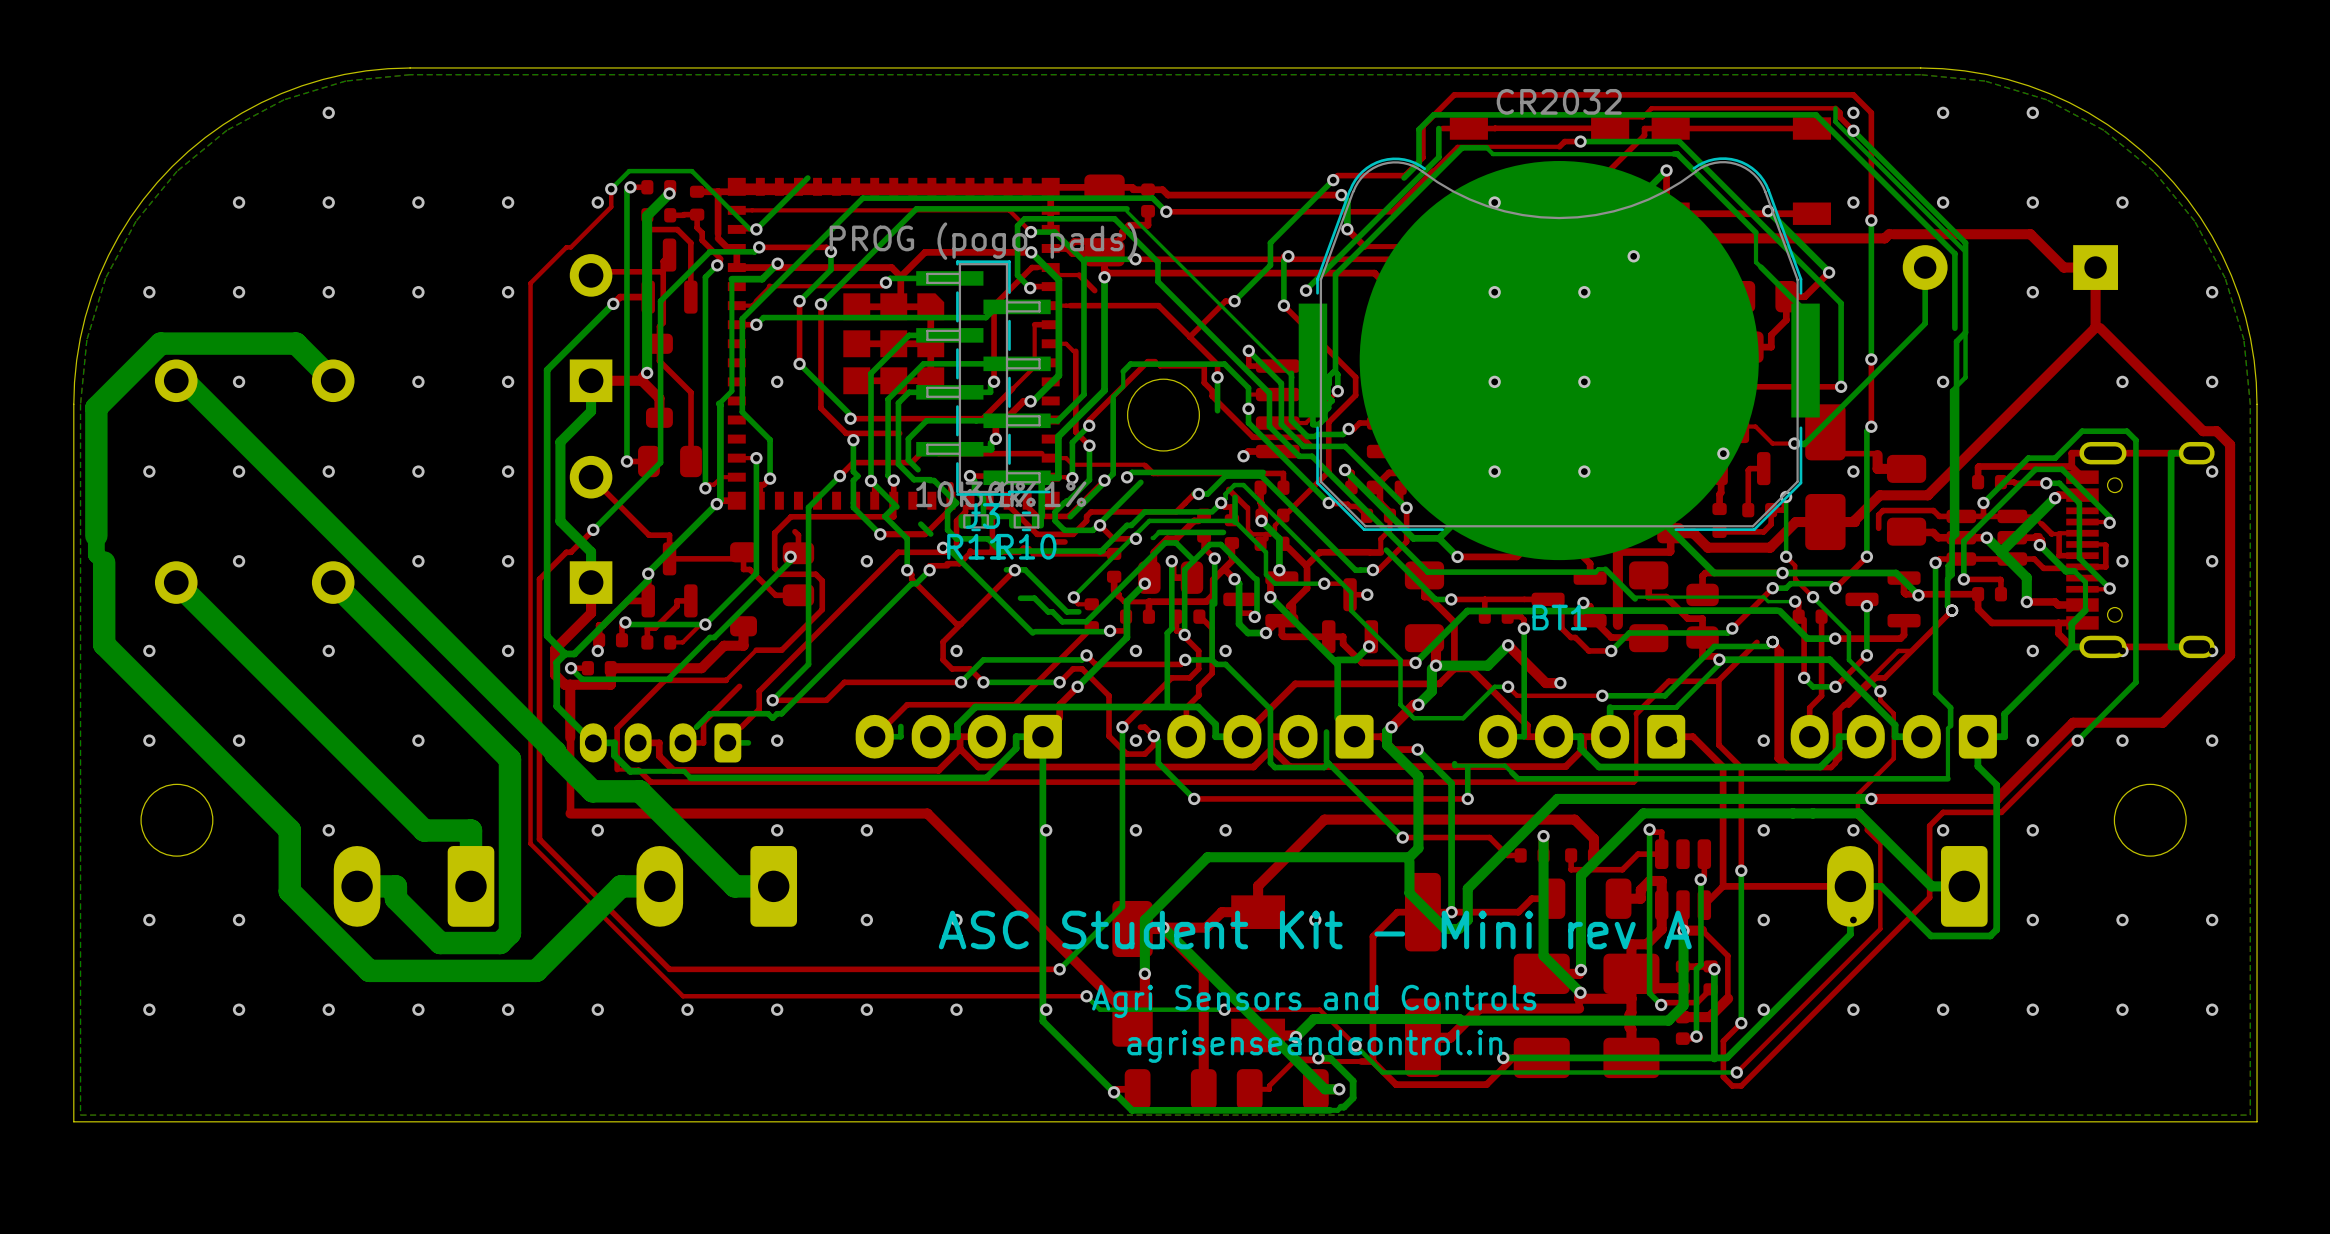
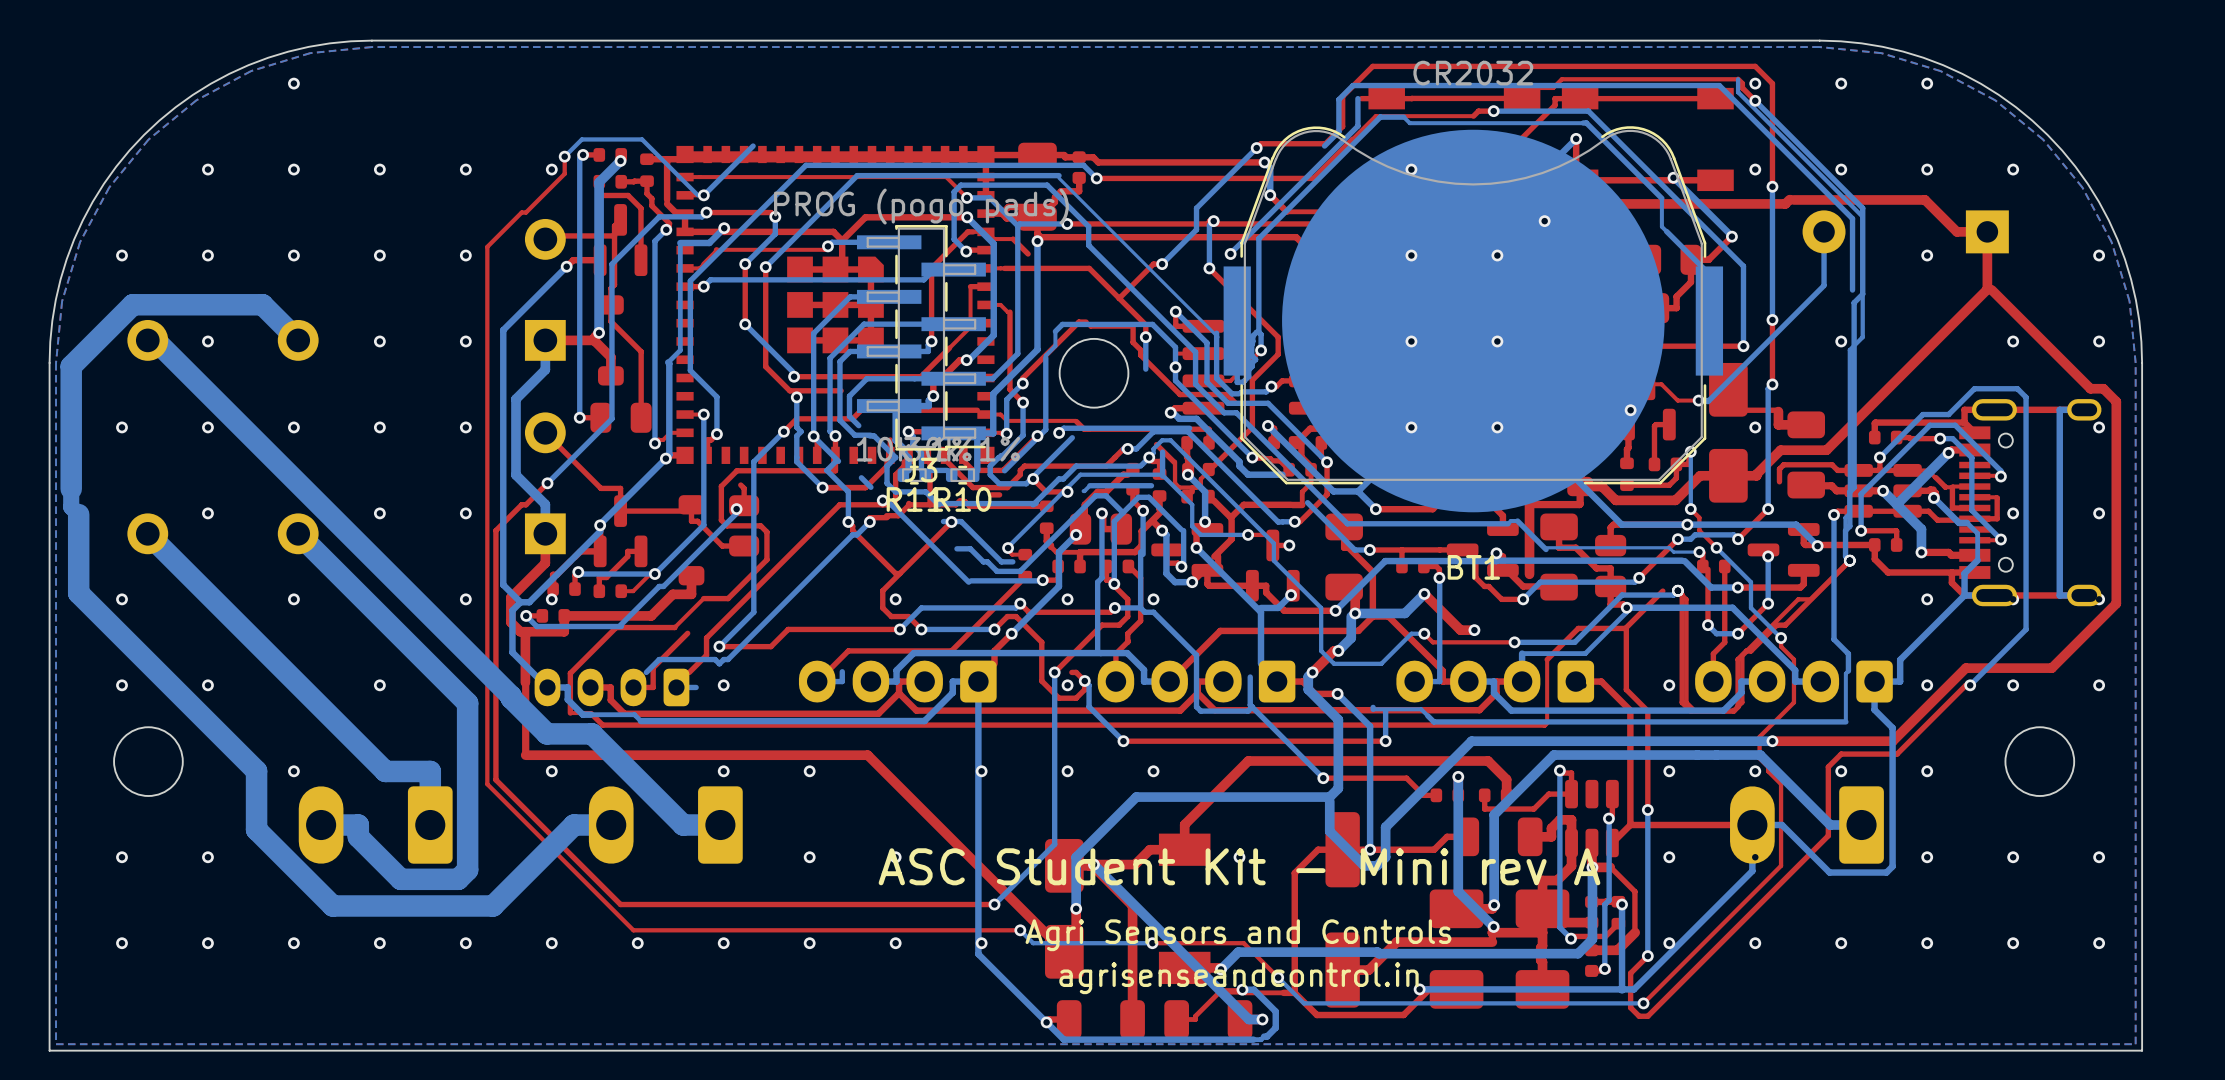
via: (777, 381) -> none
bottom track: none -> (895, 410) (895, 440) (904, 448) (904, 453) (908, 457) (908, 470)
bottom track: none -> (1175, 414) (1179, 418) (1196, 418) (1239, 461) (1239, 466) (1248, 474) (1282, 474)
via: (866, 561) -> none

